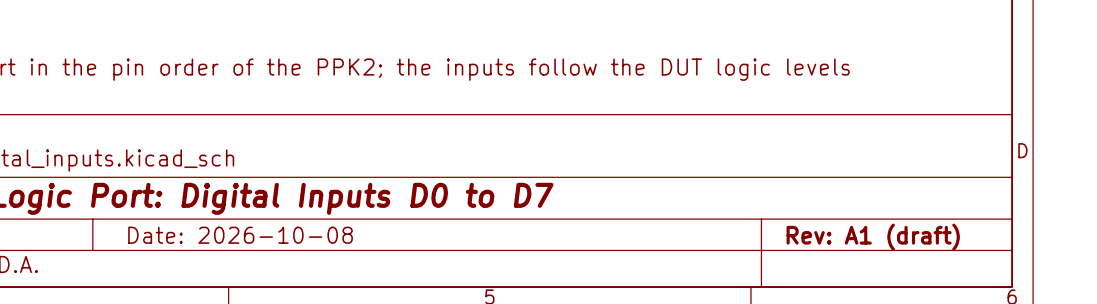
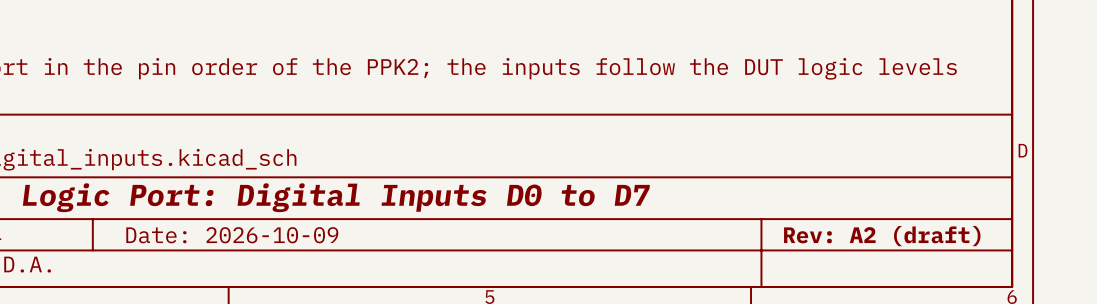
title block: Date: 2026-10-08 (240, 235) -> Date: 2026-10-09 (232, 235)
title block: Rev: A1 (draft) (873, 237) -> Rev: A2 (draft) (882, 236)

